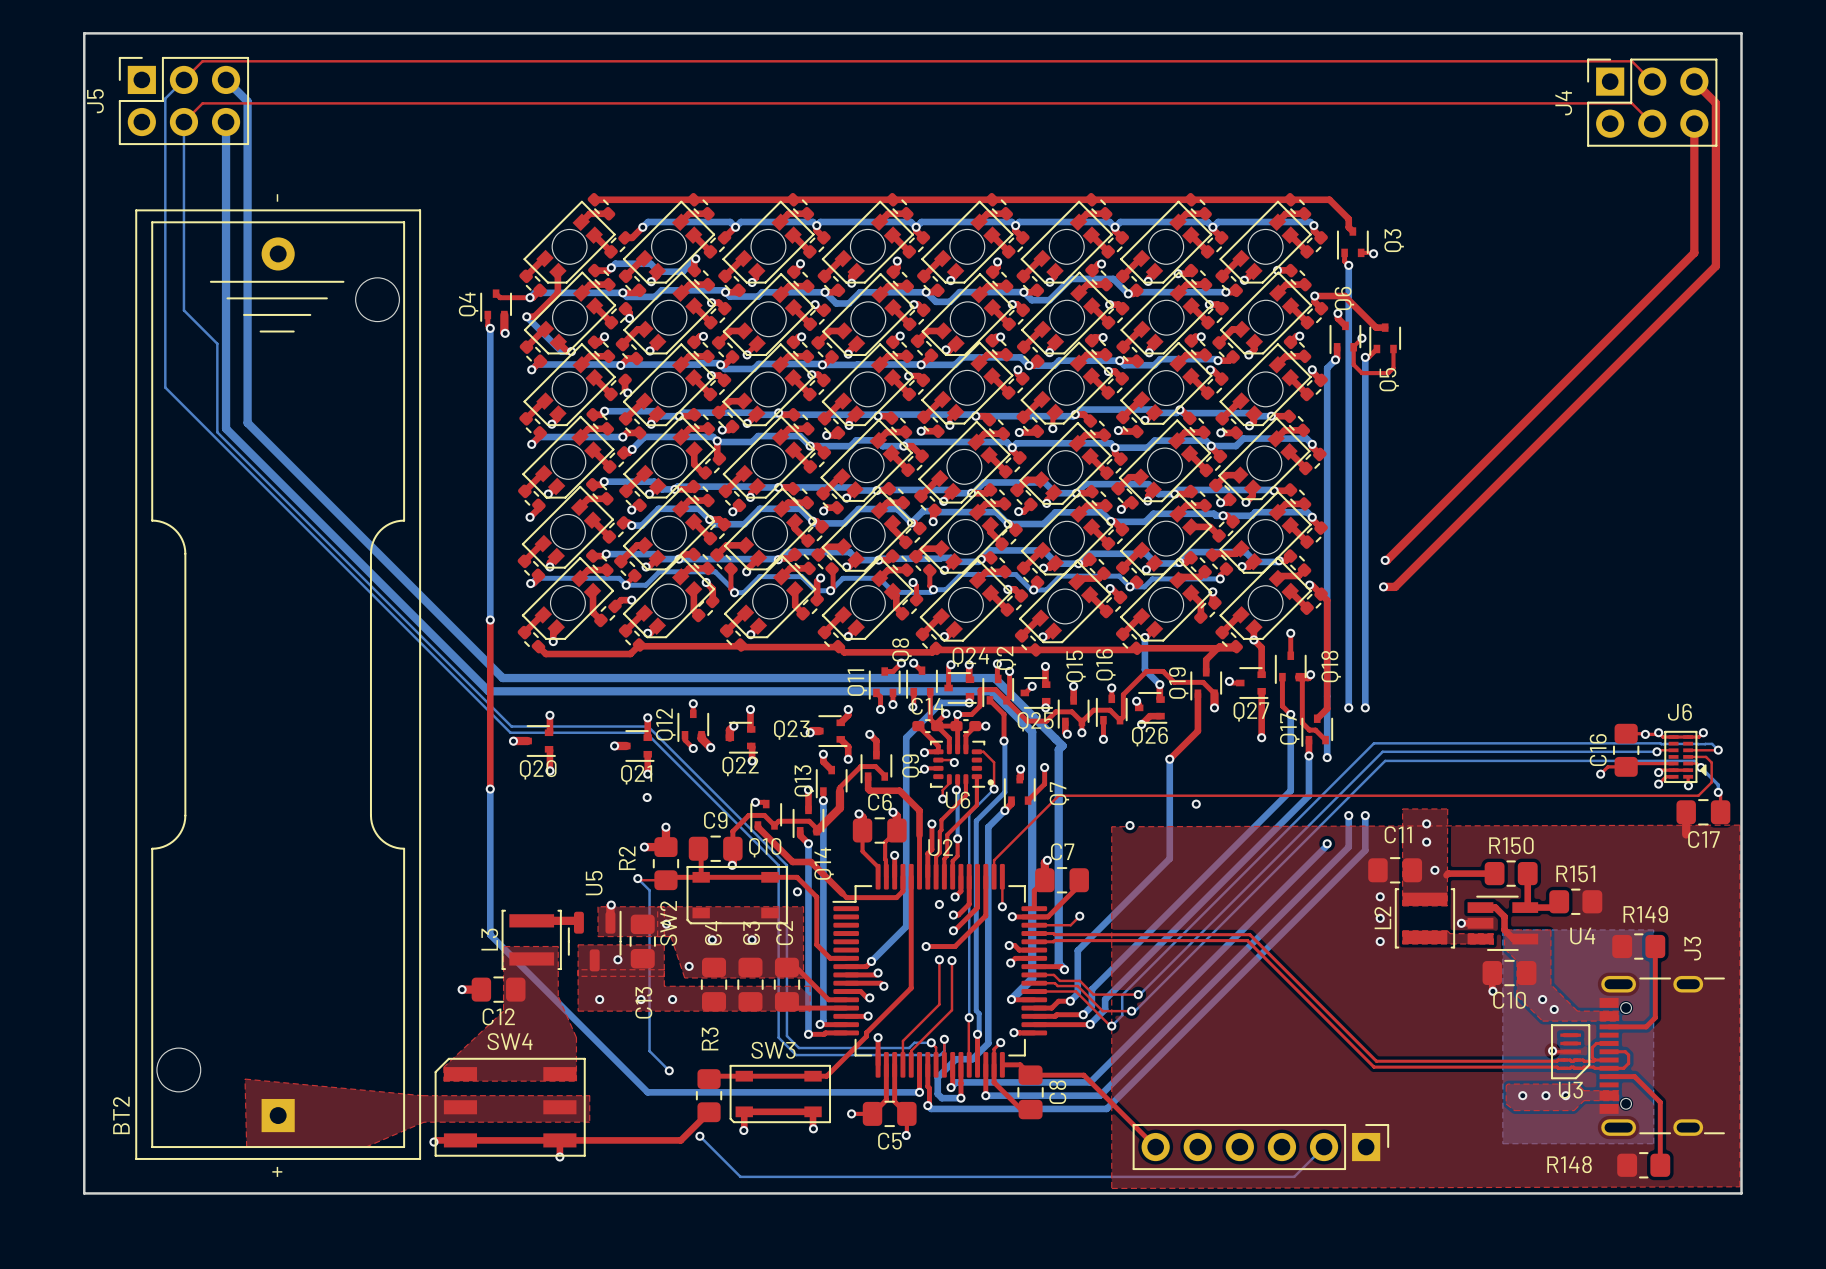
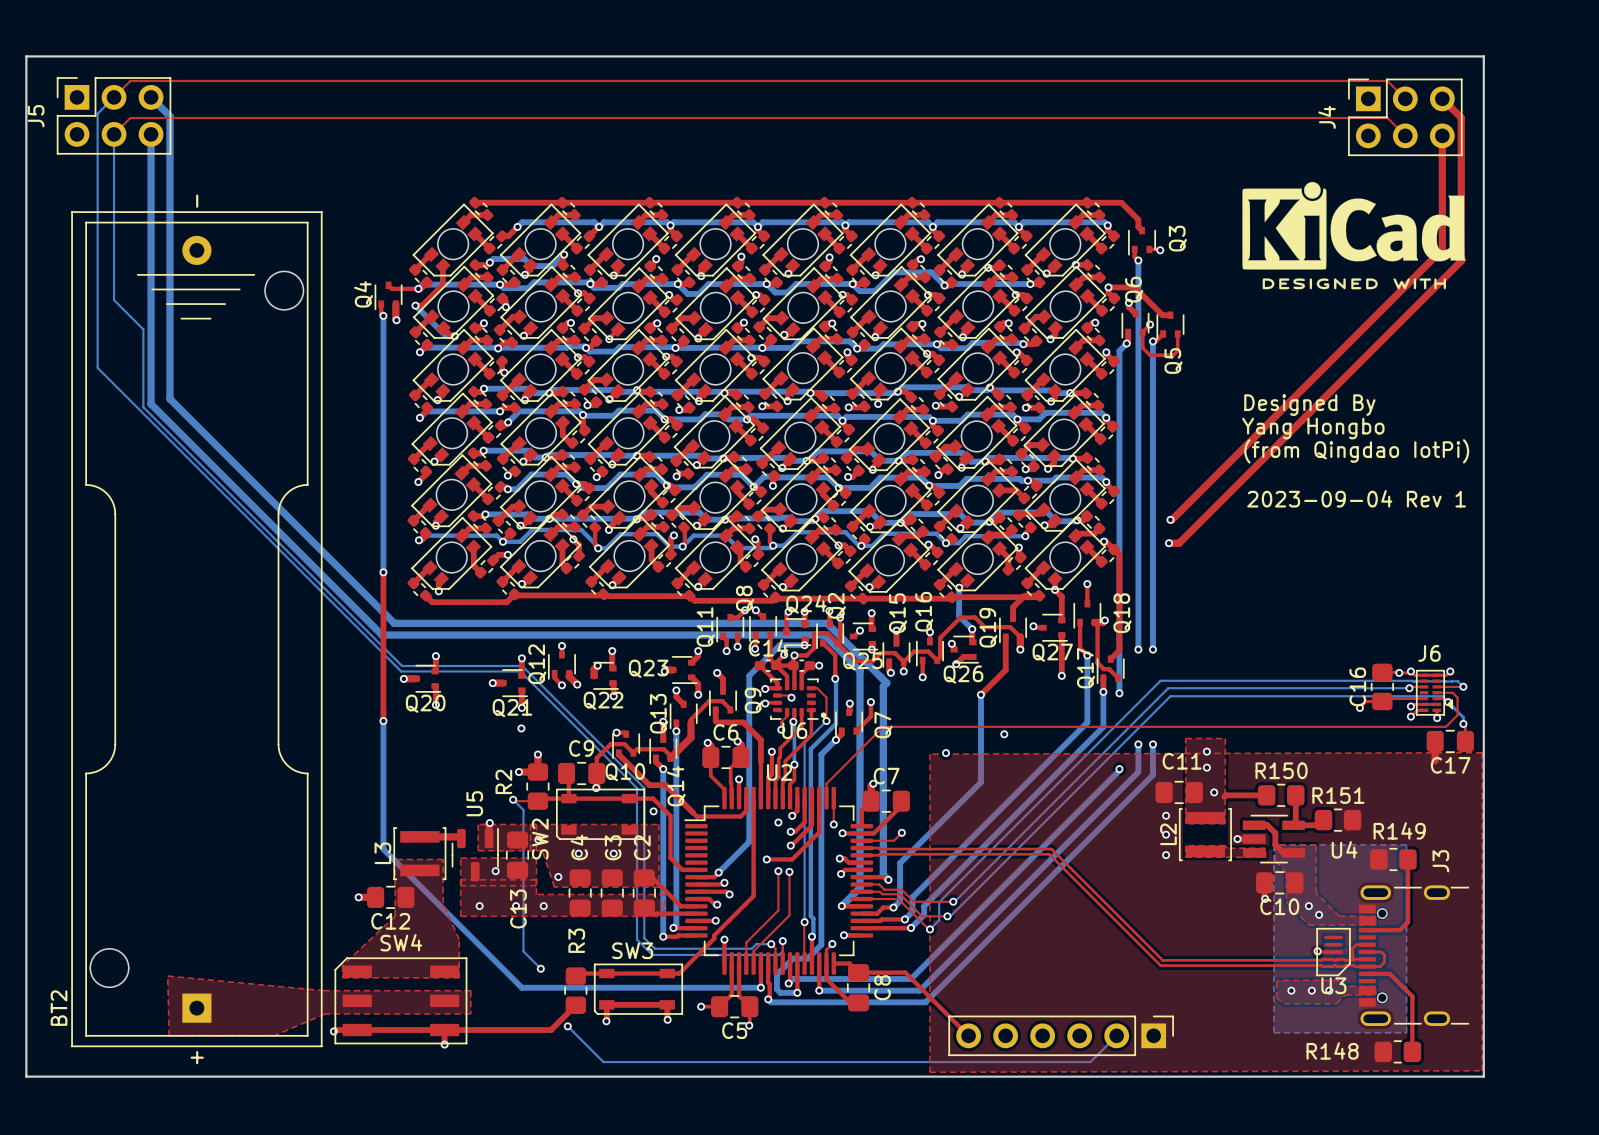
drawing: none -> [1242, 182, 1467, 290]
text: none -> Designed By (1309, 405)
text: none -> Yang Hongbo (1313, 428)
text: none -> (from Qingdao IotPi) (1356, 451)
text: none -> 2023-09-04 Rev 1 (1356, 498)

